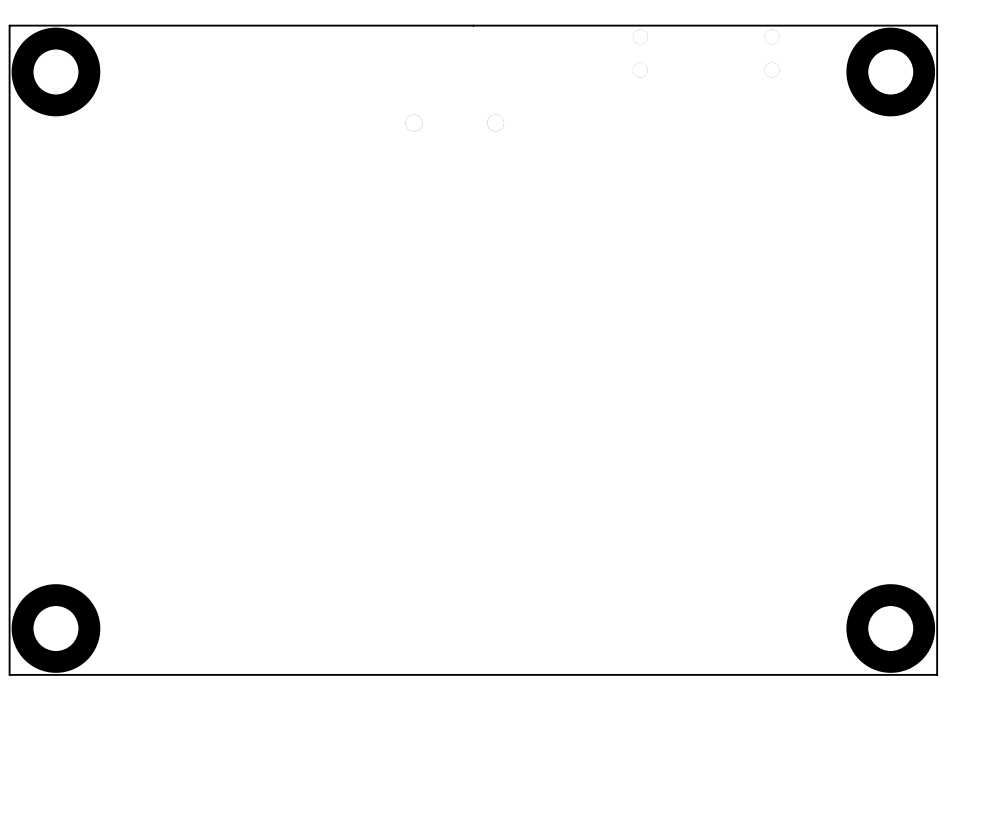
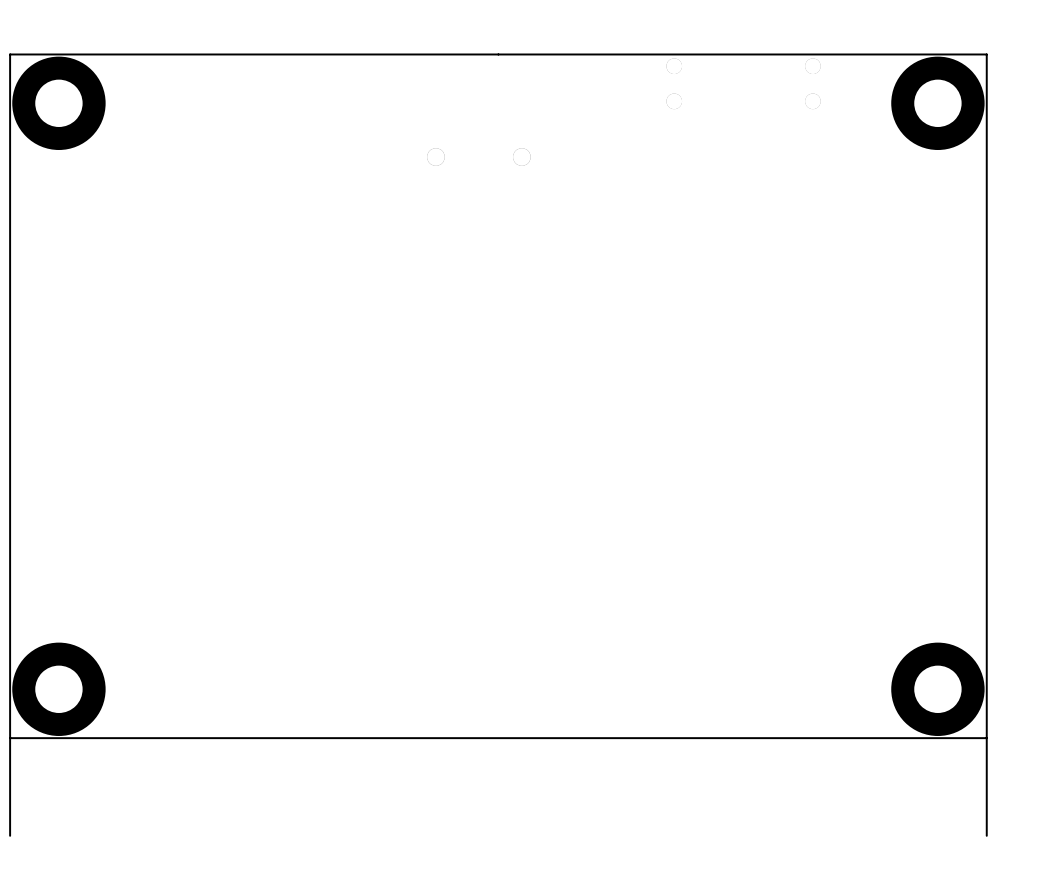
board edge: none -> (10, 738) (10, 835)
board edge: none -> (986, 738) (986, 835)

